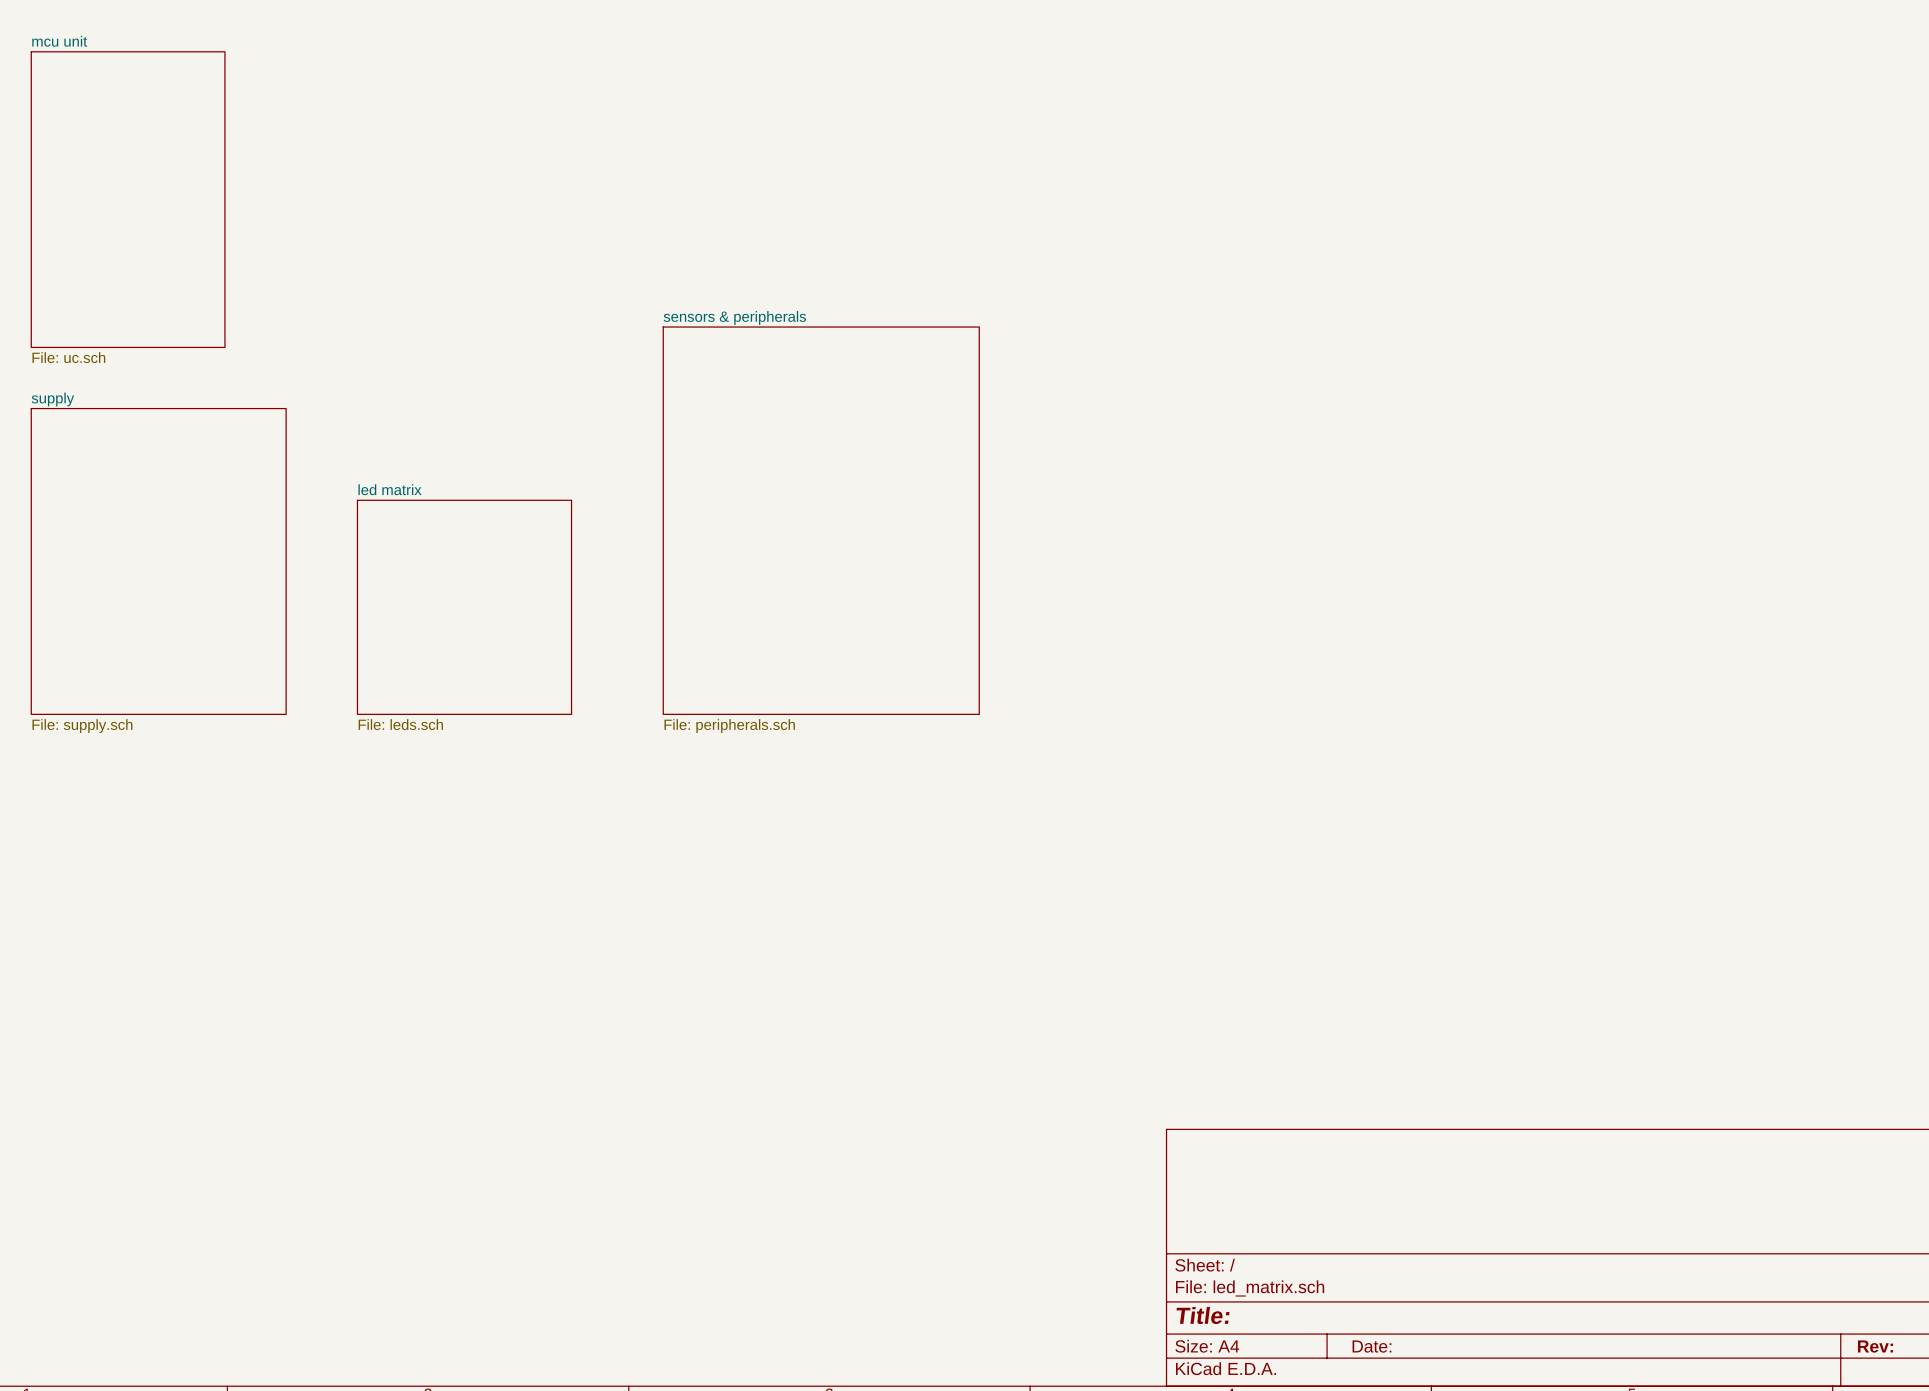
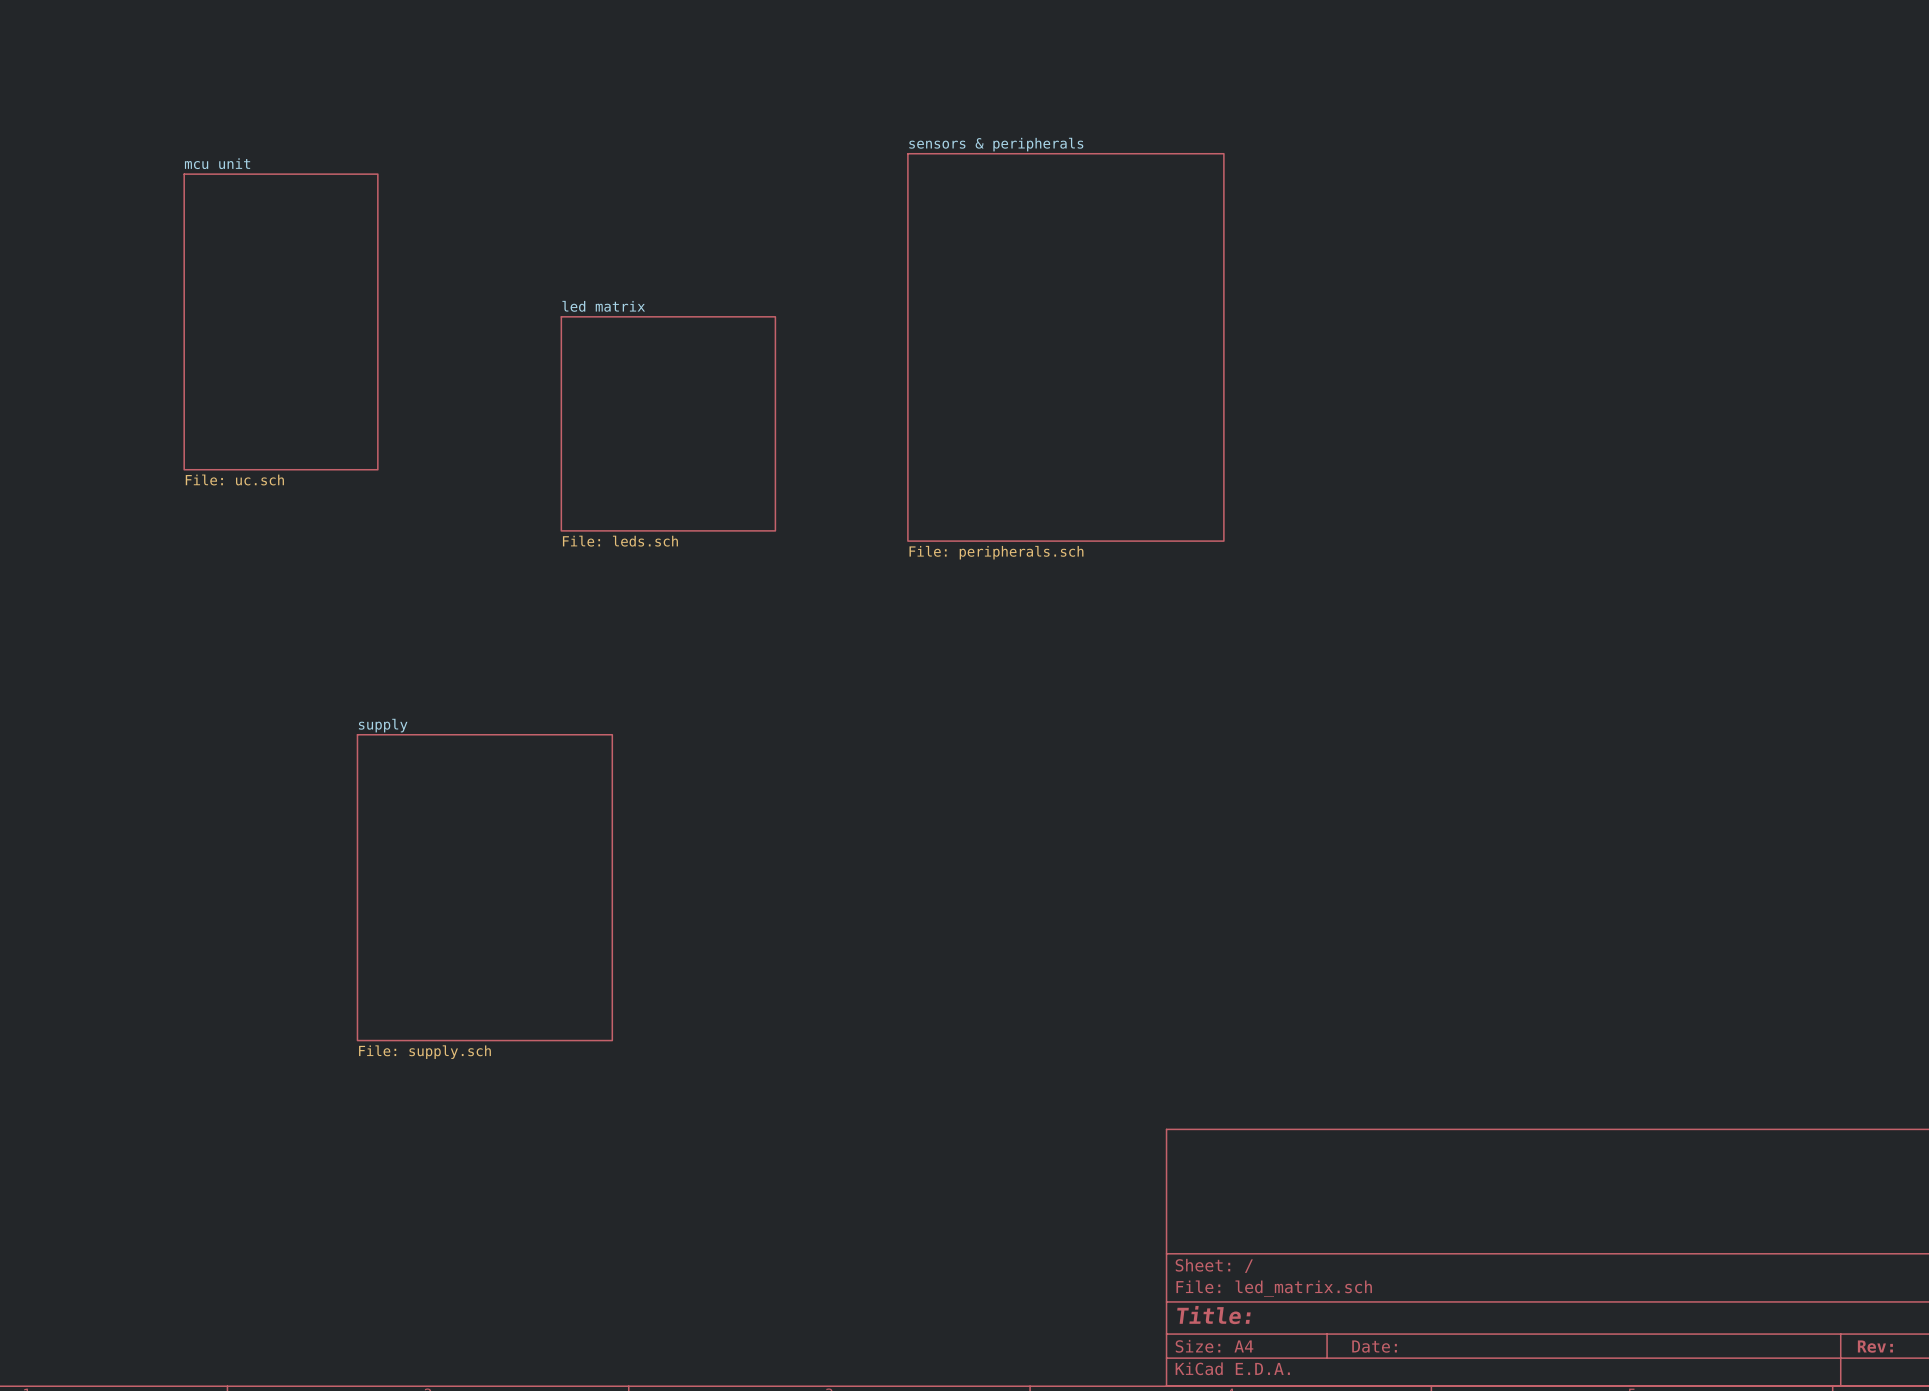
sheet mcu unit position: (128, 199) -> (281, 321)
sheet sensors & peripherals: none -> File: peripherals.sch (1065, 347)
sheet led matrix: none -> File: leds.sch (668, 423)
sheet sensors & peripherals: File: peripherals.sch (821, 520) -> none
sheet supply: File: supply.sch (158, 561) -> none
sheet led matrix: File: leds.sch (464, 607) -> none
sheet supply: none -> File: supply.sch (484, 887)

